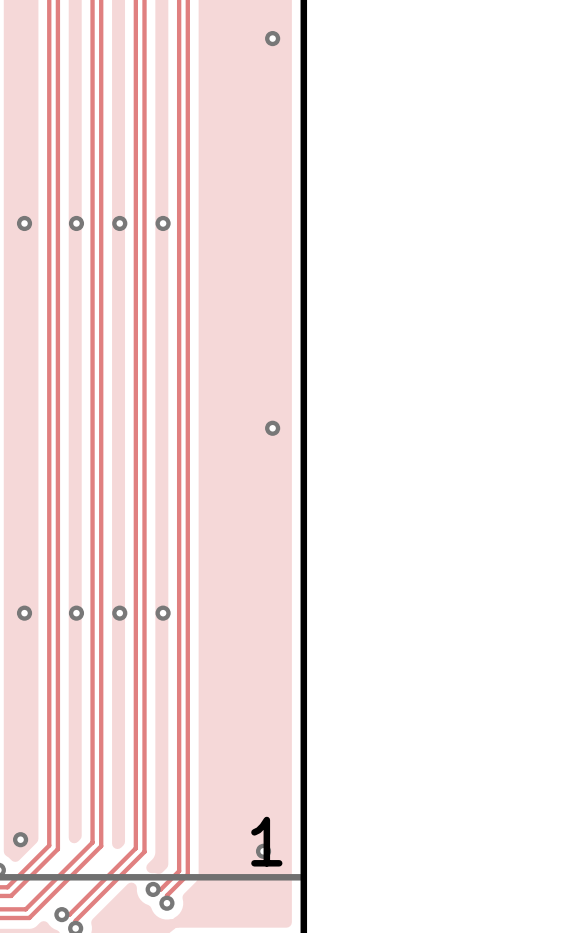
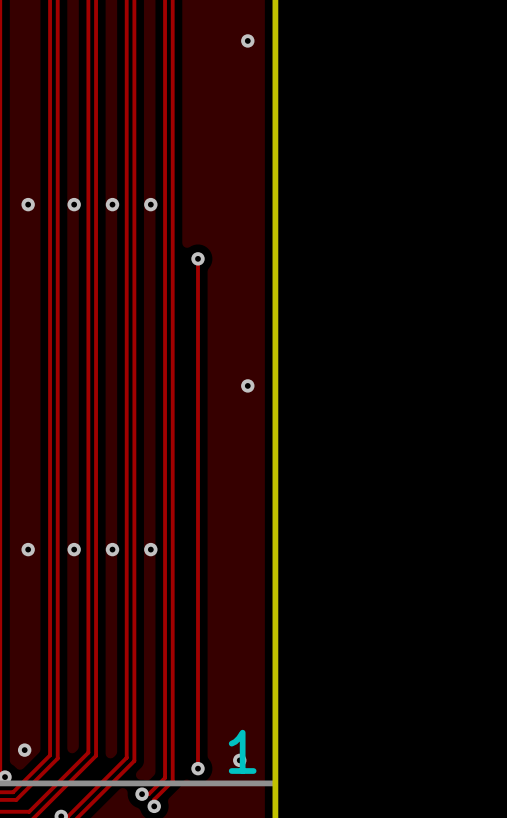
track: none -> (198, 258) (198, 768)
via: none -> (198, 258)
via: none -> (198, 768)

